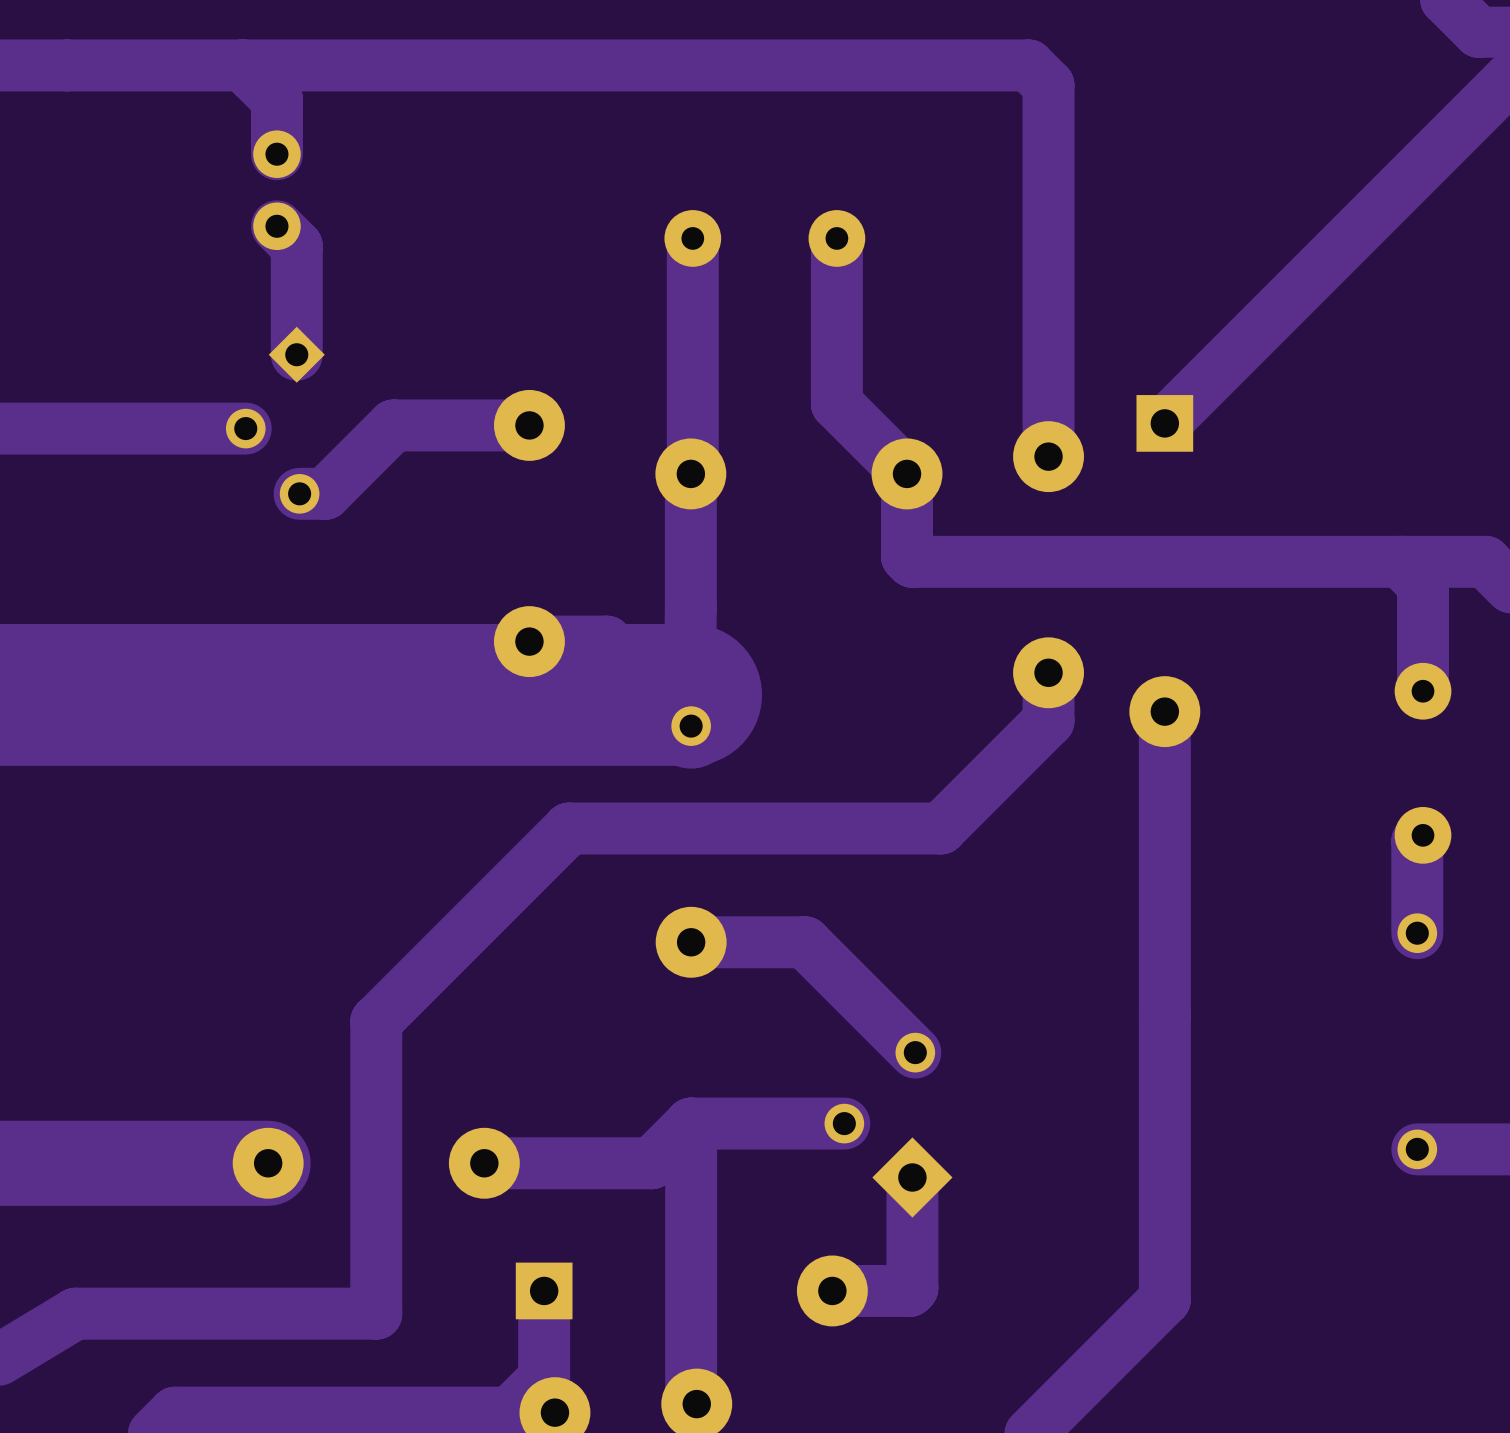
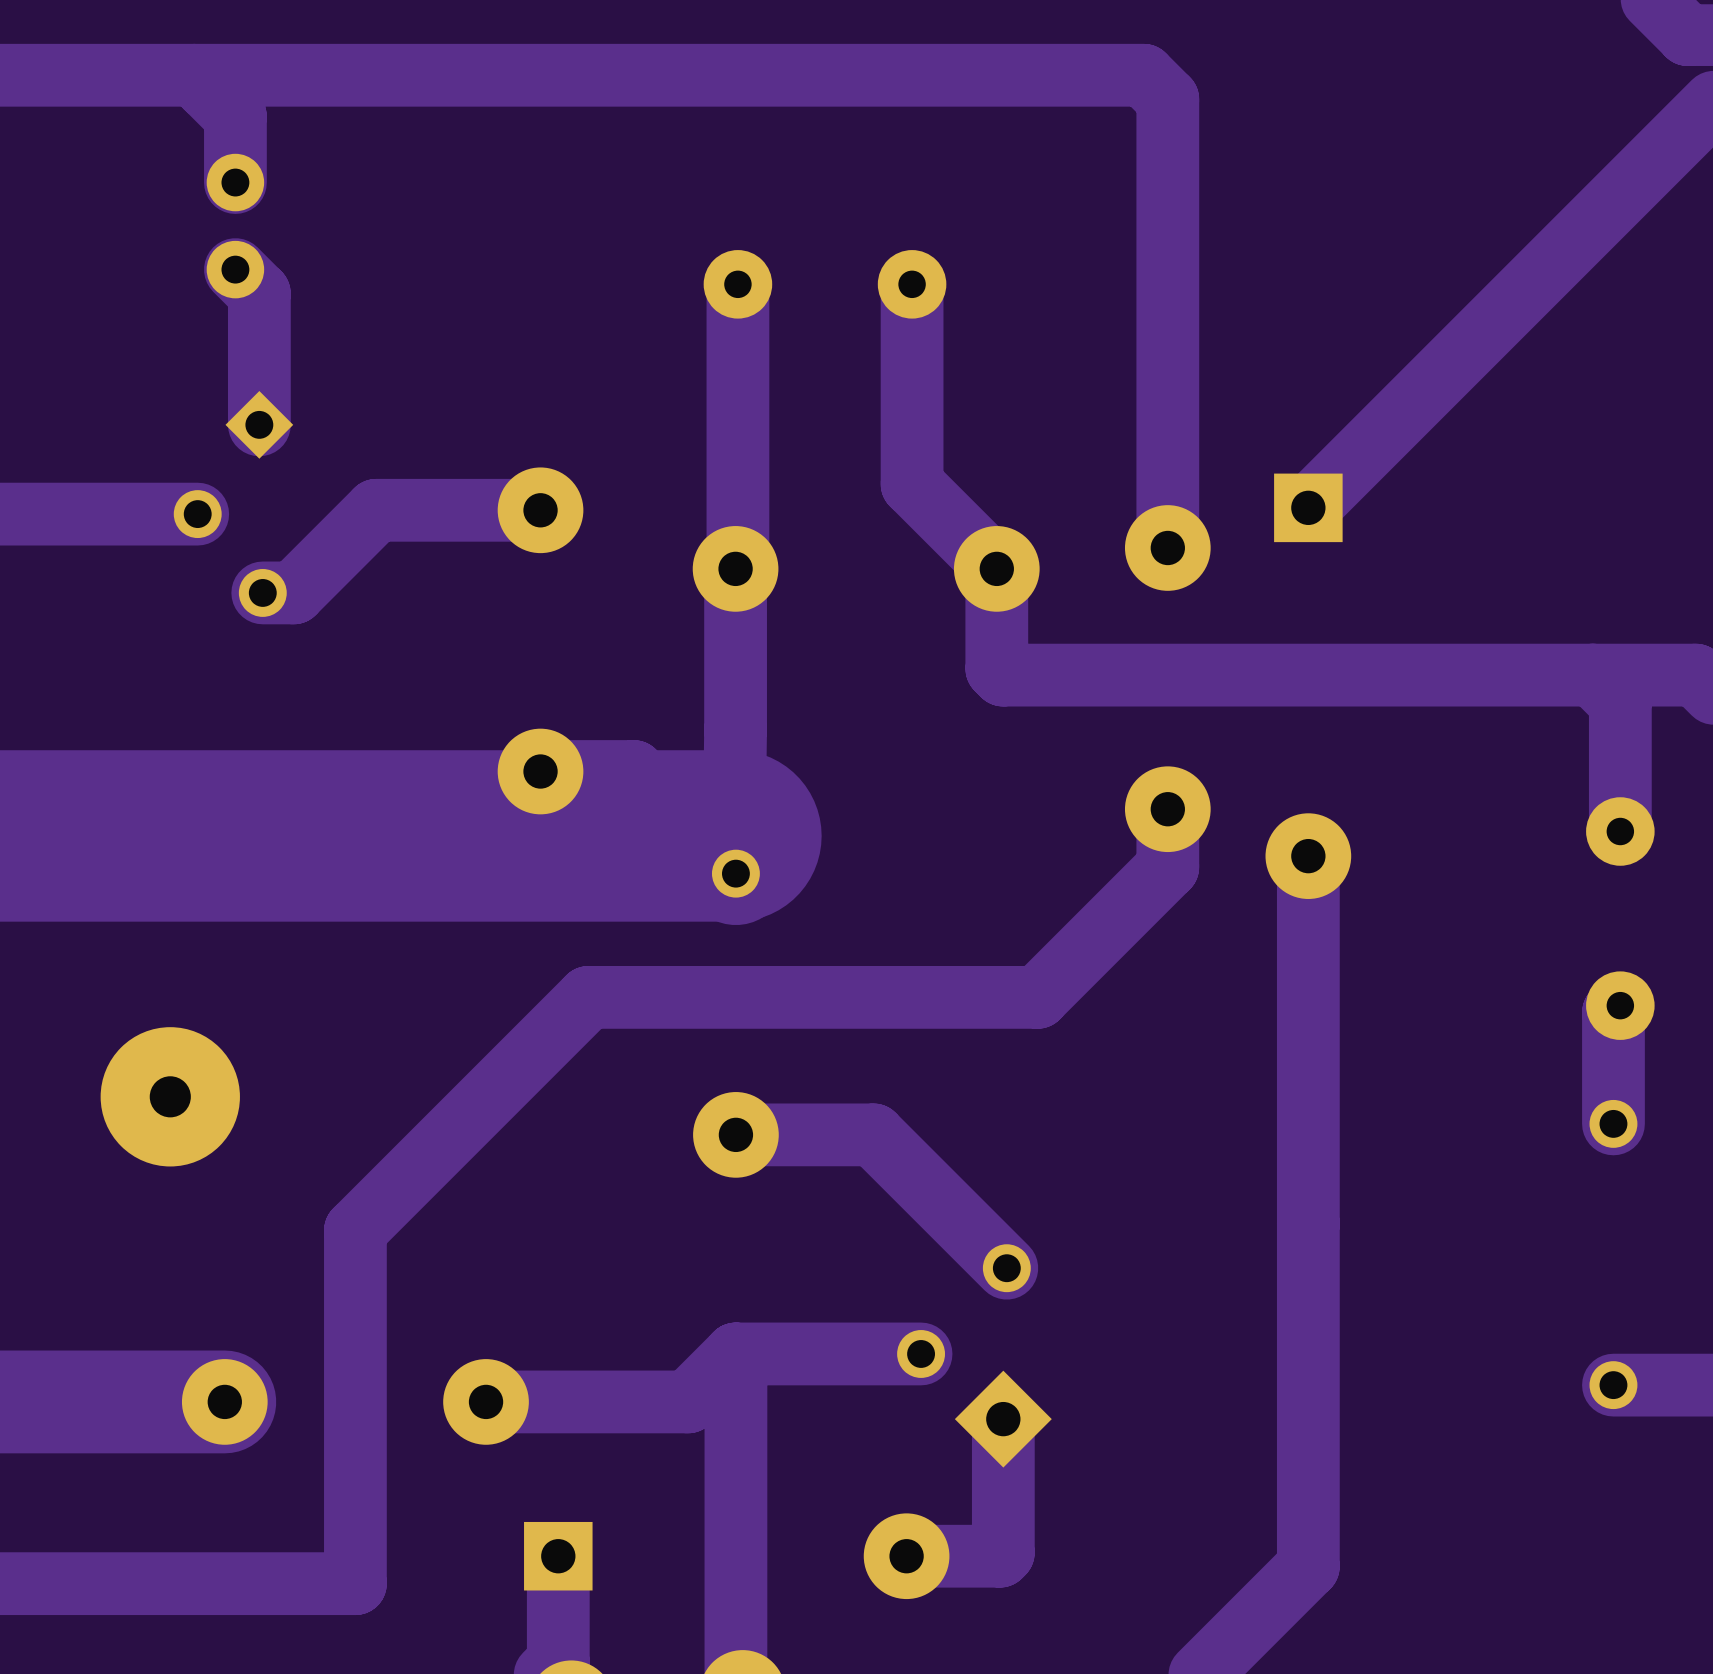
part: none -> (170, 1096)

